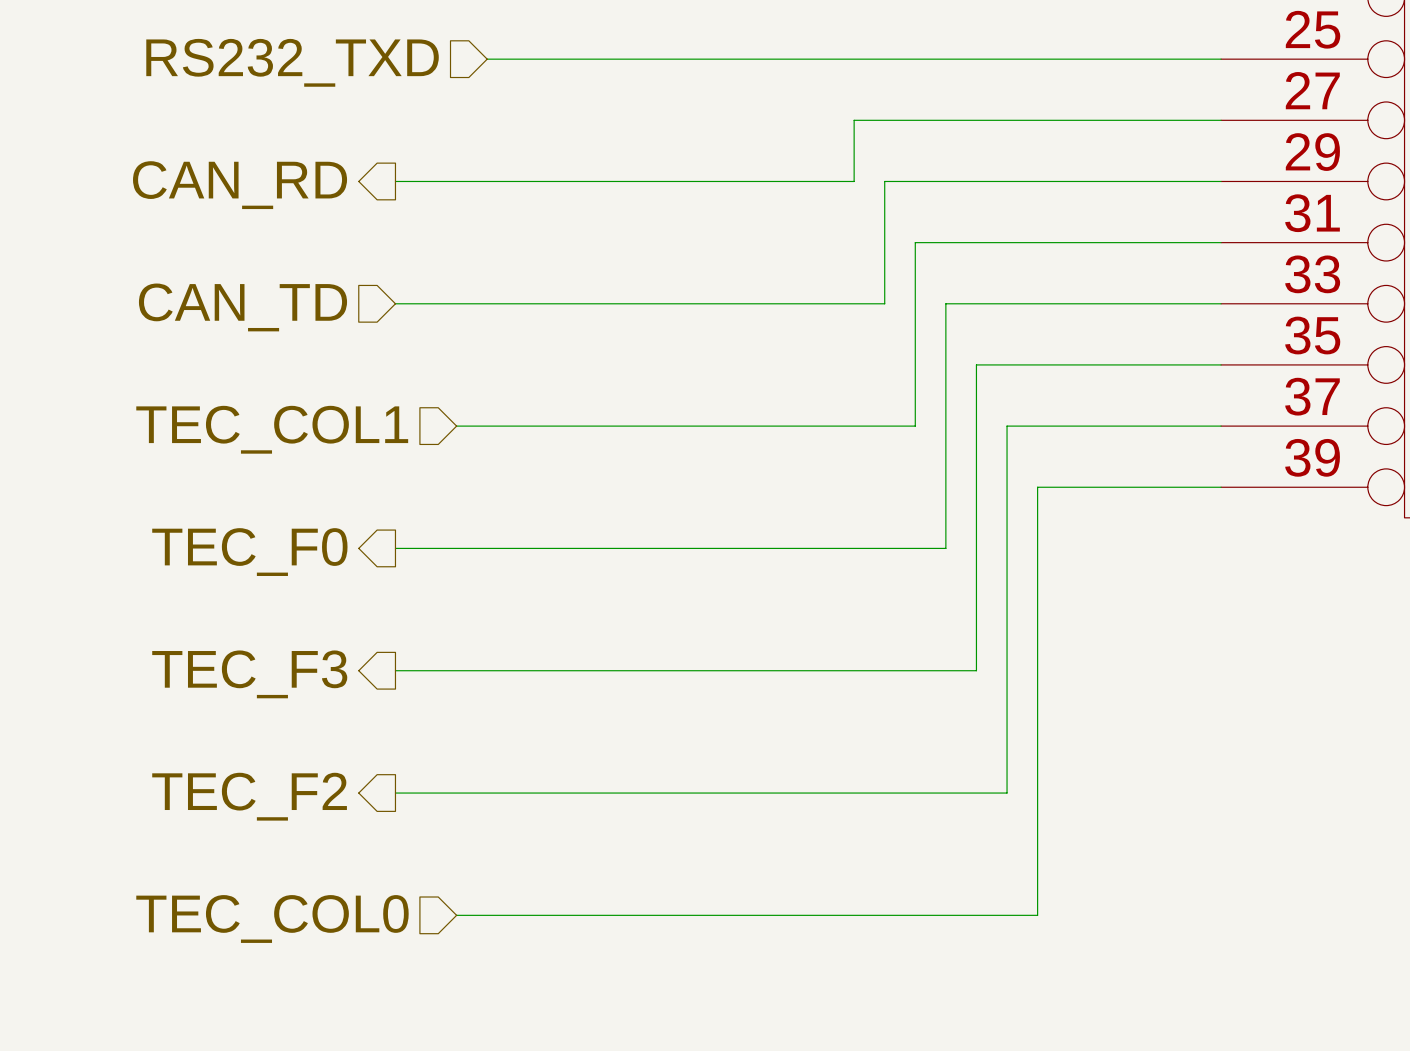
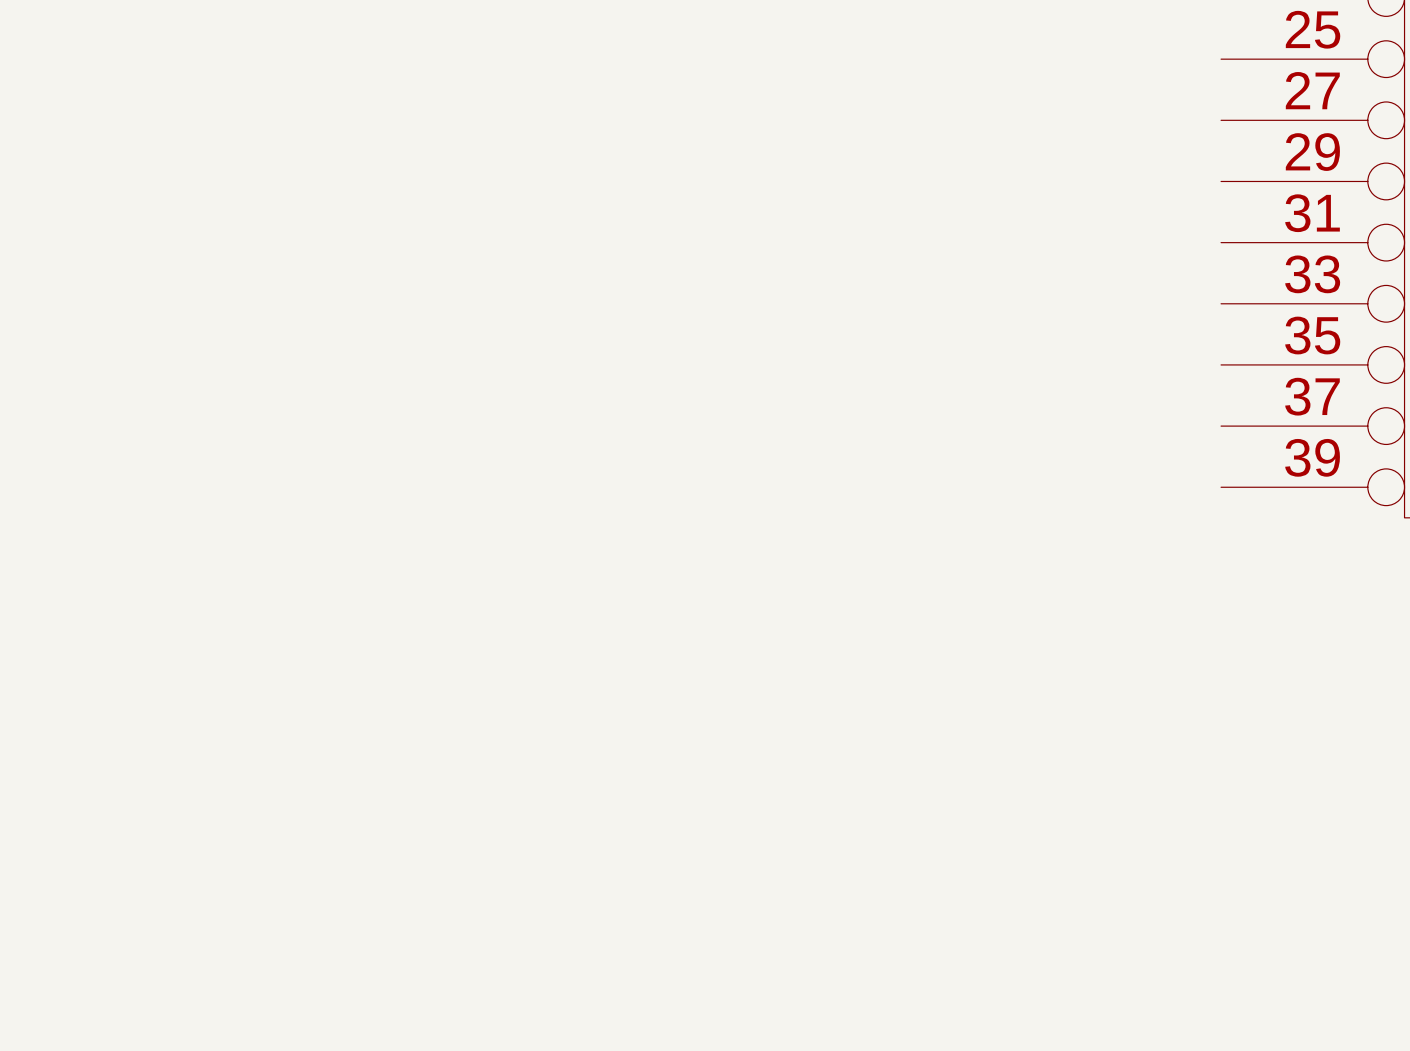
wire: (487, 59) (1221, 59) -> none
hierarchical label: RS232_TXD (292, 62) -> none
wire: (1221, 120) (854, 120) (854, 181) (395, 181) -> none
wire: (1221, 181) (884, 181) (884, 303) (395, 303) -> none
hierarchical label: CAN_RD (240, 185) -> none
wire: (1221, 242) (915, 242) (915, 426) (456, 426) -> none
wire: (1221, 303) (945, 303) (945, 548) (395, 548) -> none
hierarchical label: CAN_TD (242, 307) -> none
wire: (1221, 364) (976, 364) (976, 670) (395, 670) -> none
wire: (1221, 426) (1007, 426) (1007, 793) (395, 793) -> none
hierarchical label: TEC_COL1 (272, 429) -> none
wire: (1221, 487) (1037, 487) (1037, 915) (456, 915) -> none
hierarchical label: TEC_F0 (249, 552) -> none
hierarchical label: TEC_F3 (249, 674) -> none
hierarchical label: TEC_F2 (249, 796) -> none
hierarchical label: TEC_COL0 (272, 919) -> none

